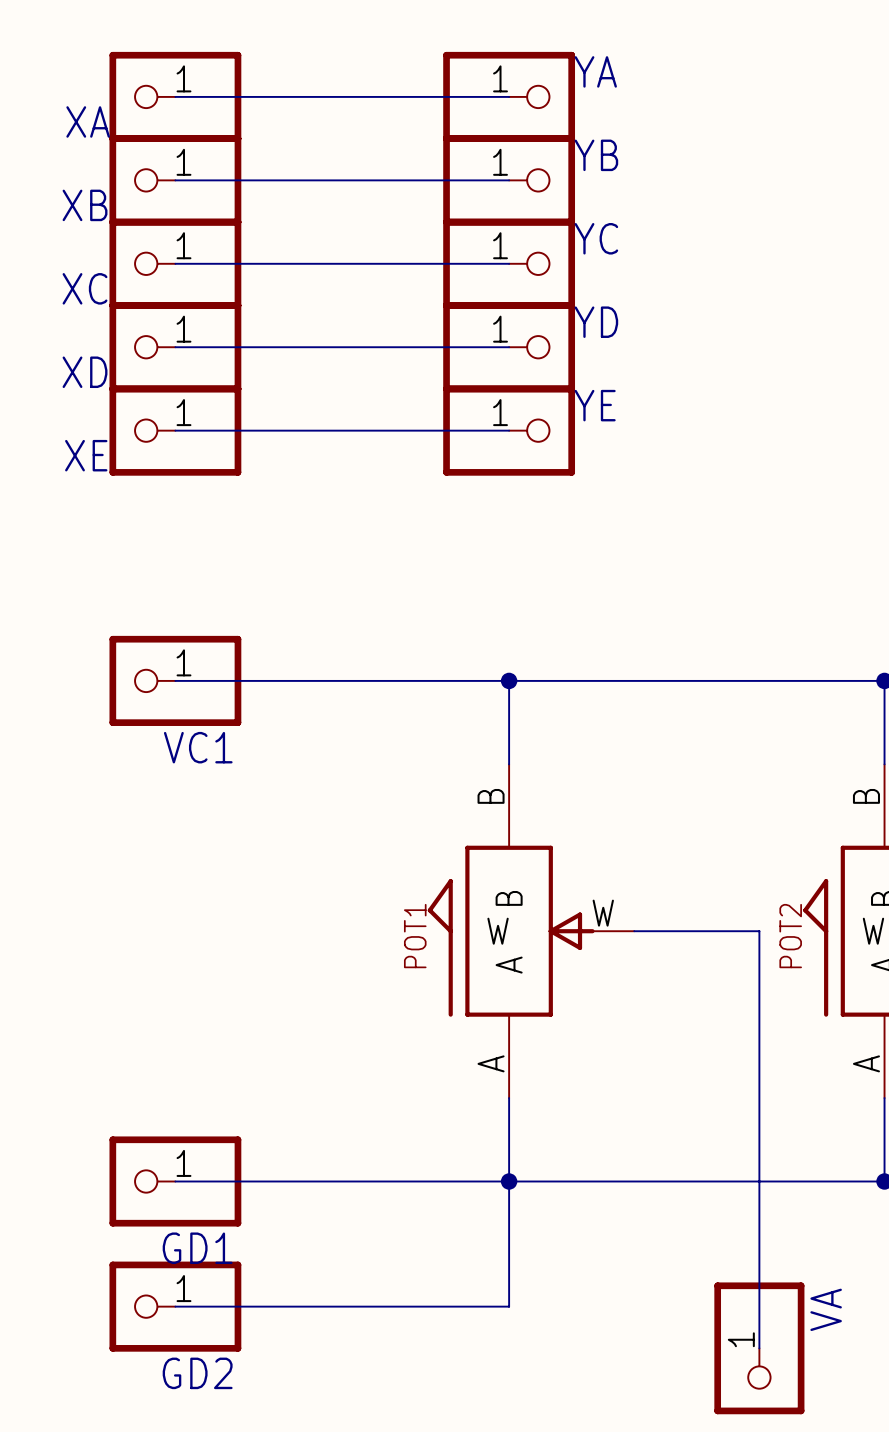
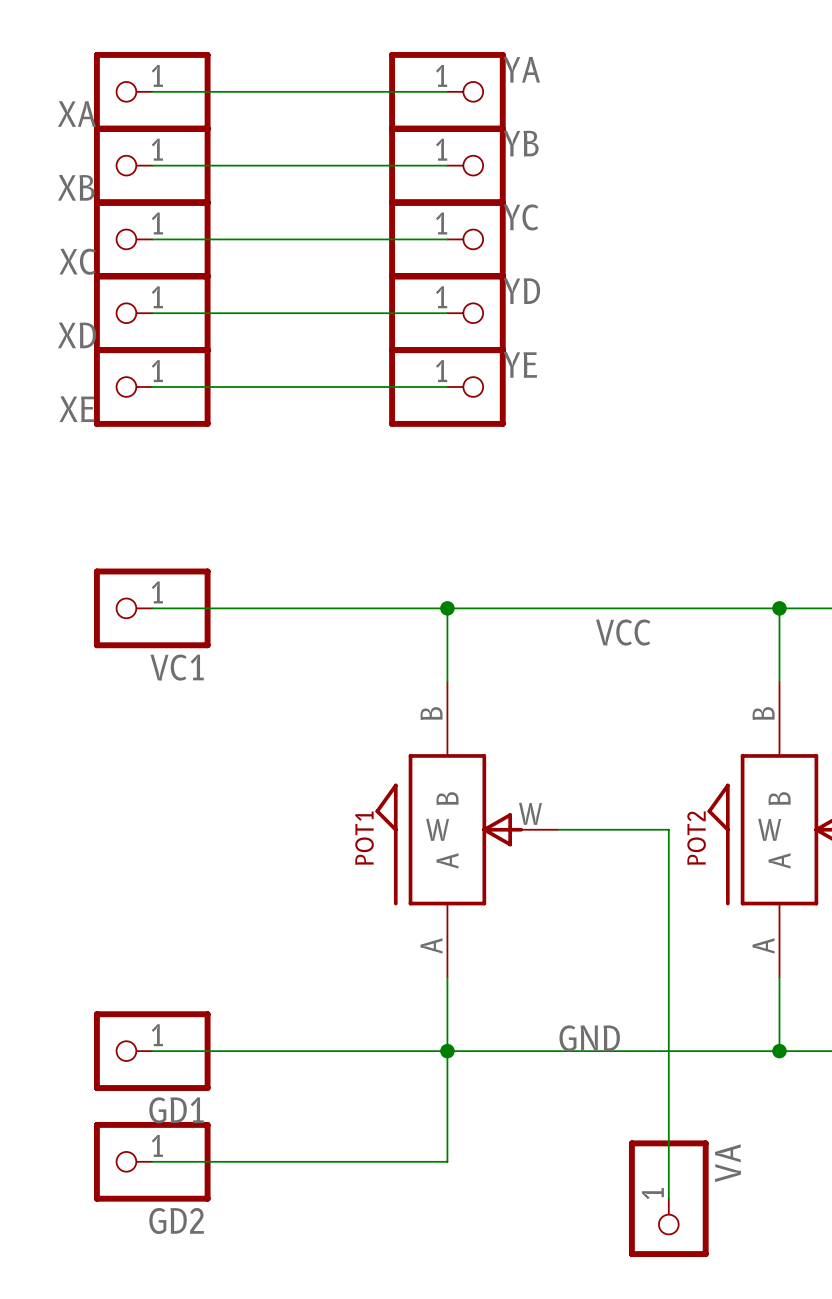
label: none -> VCC (623, 632)
label: none -> GND (589, 1038)

